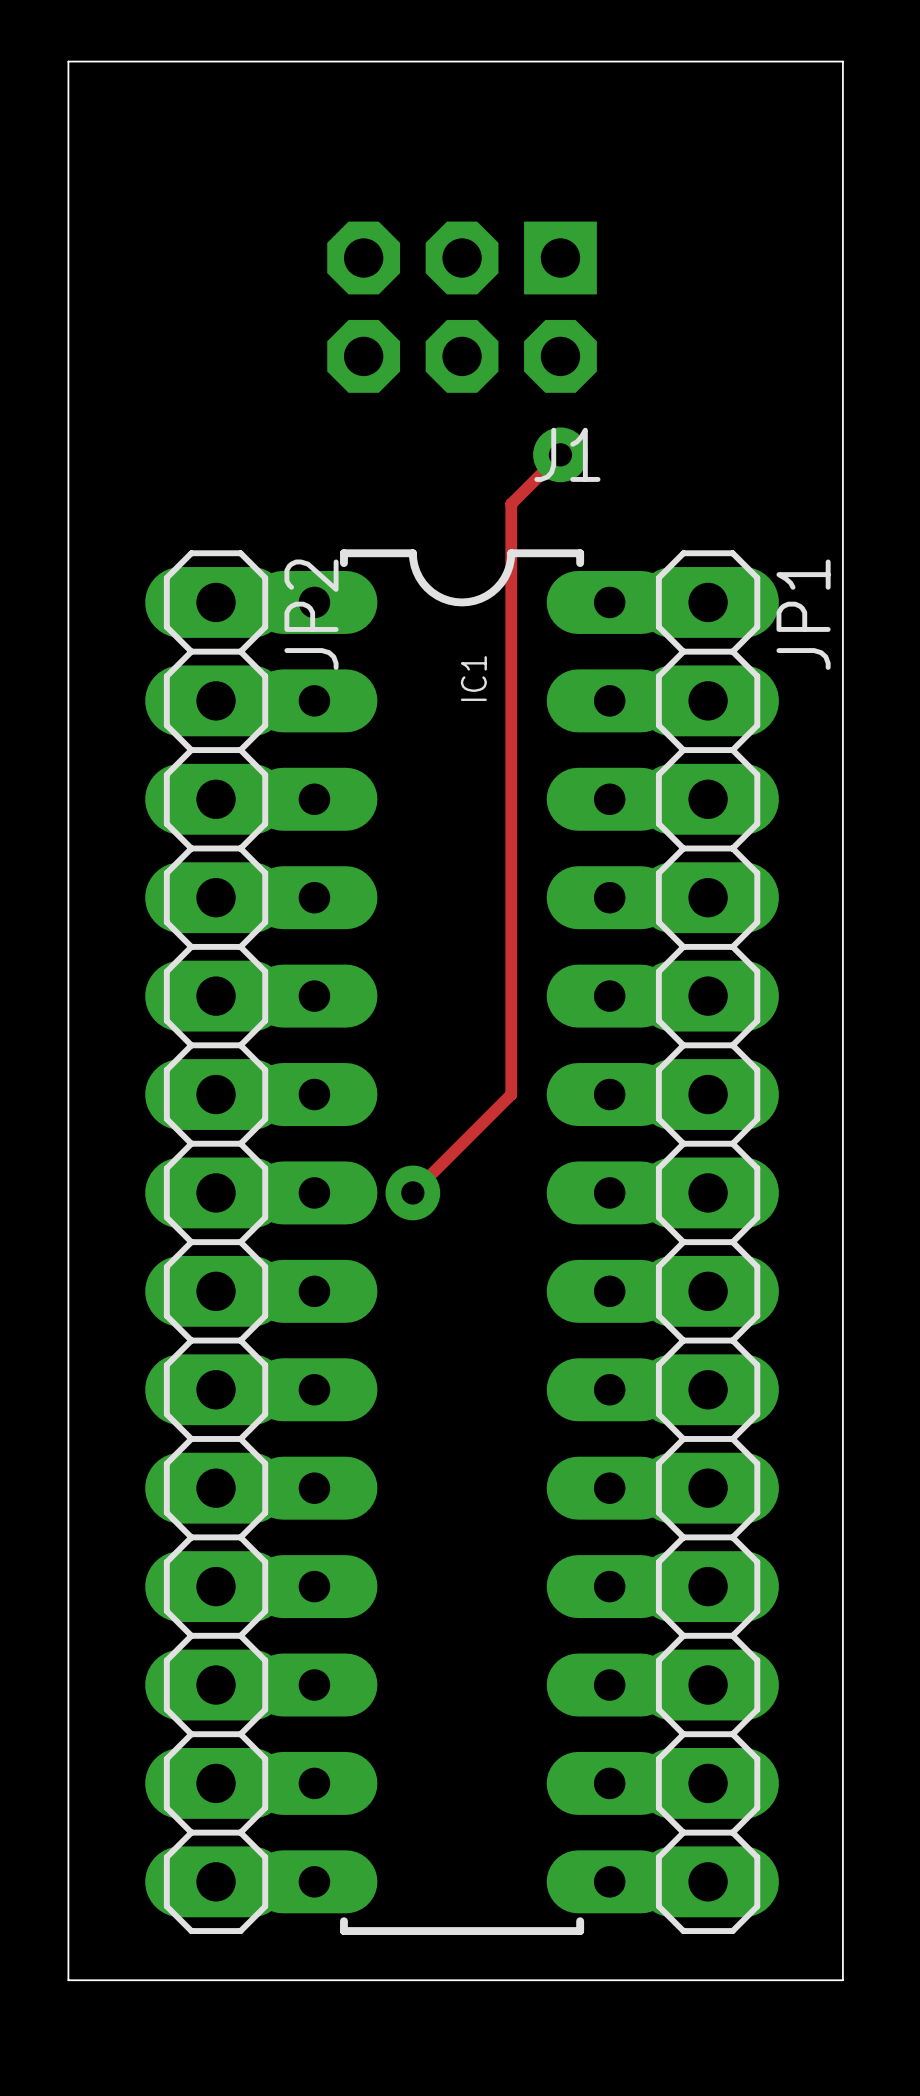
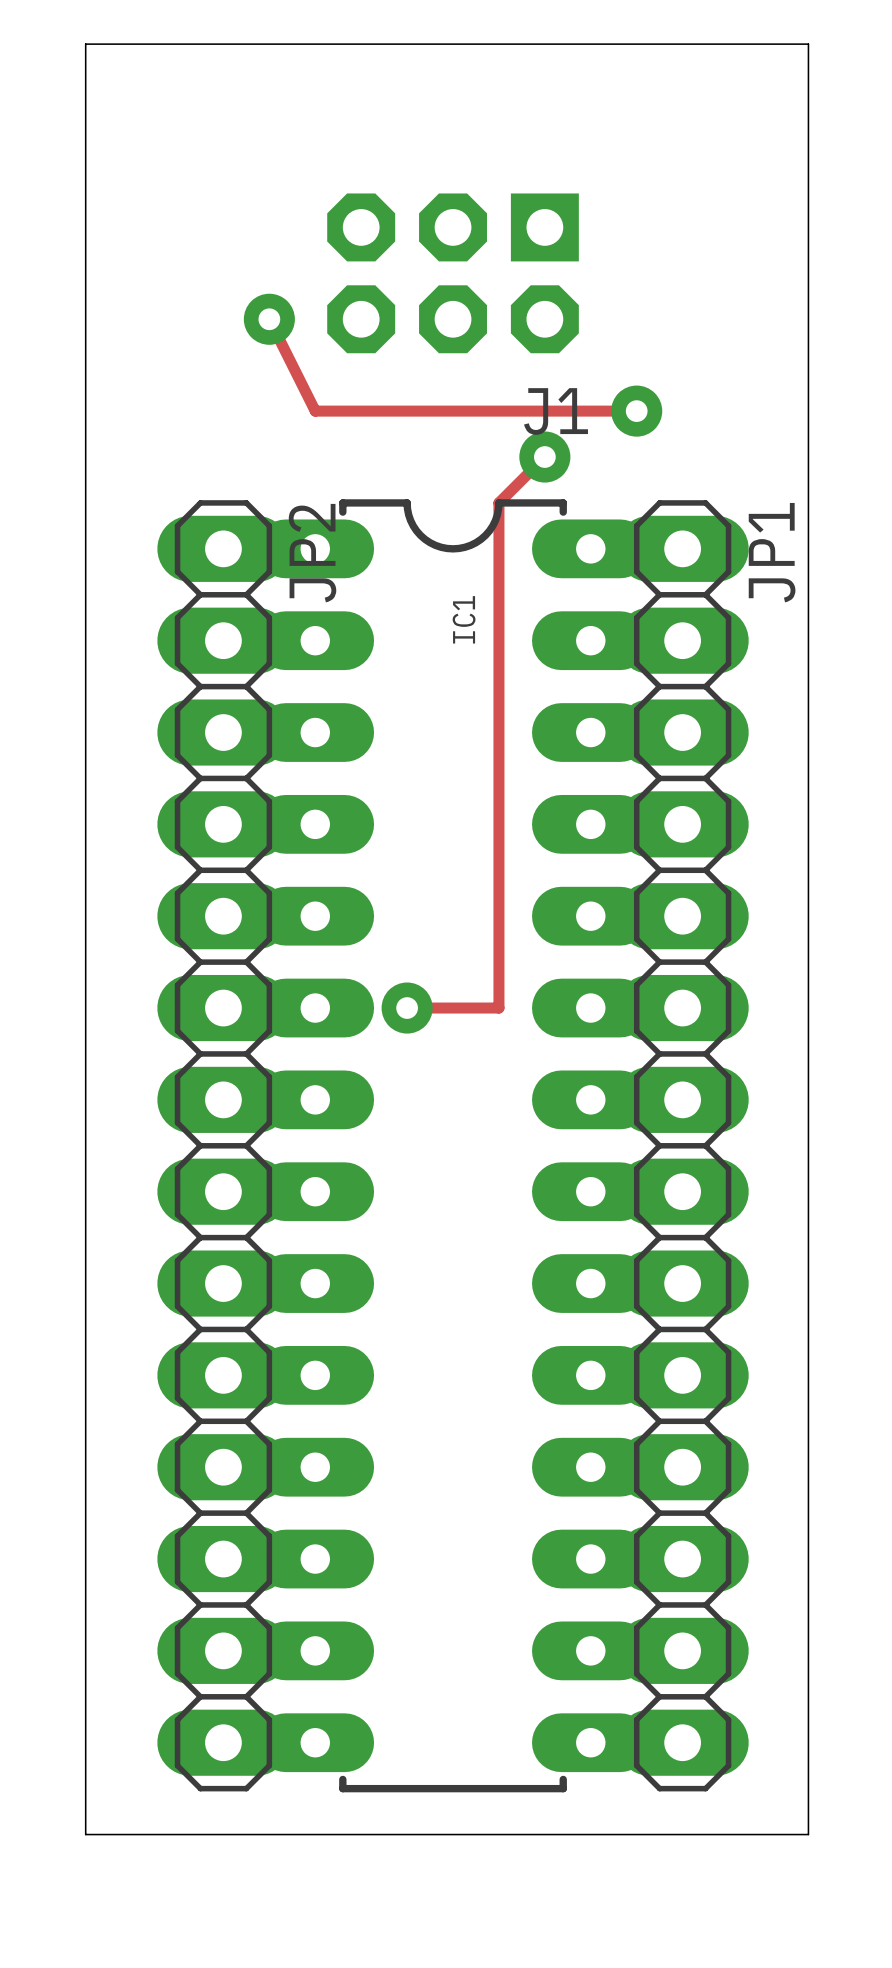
track: none -> (269, 319) (315, 411) (636, 411)
via: none -> (269, 319)
track: (560, 454) (511, 504) (511, 553) -> (544, 457) (498, 502)
via: (560, 454) -> none
via: none -> (636, 411)
via: none -> (544, 457)
track: (511, 1094) (412, 1192) -> (498, 1008) (407, 1008)
via position: (412, 1192) -> (407, 1008)

